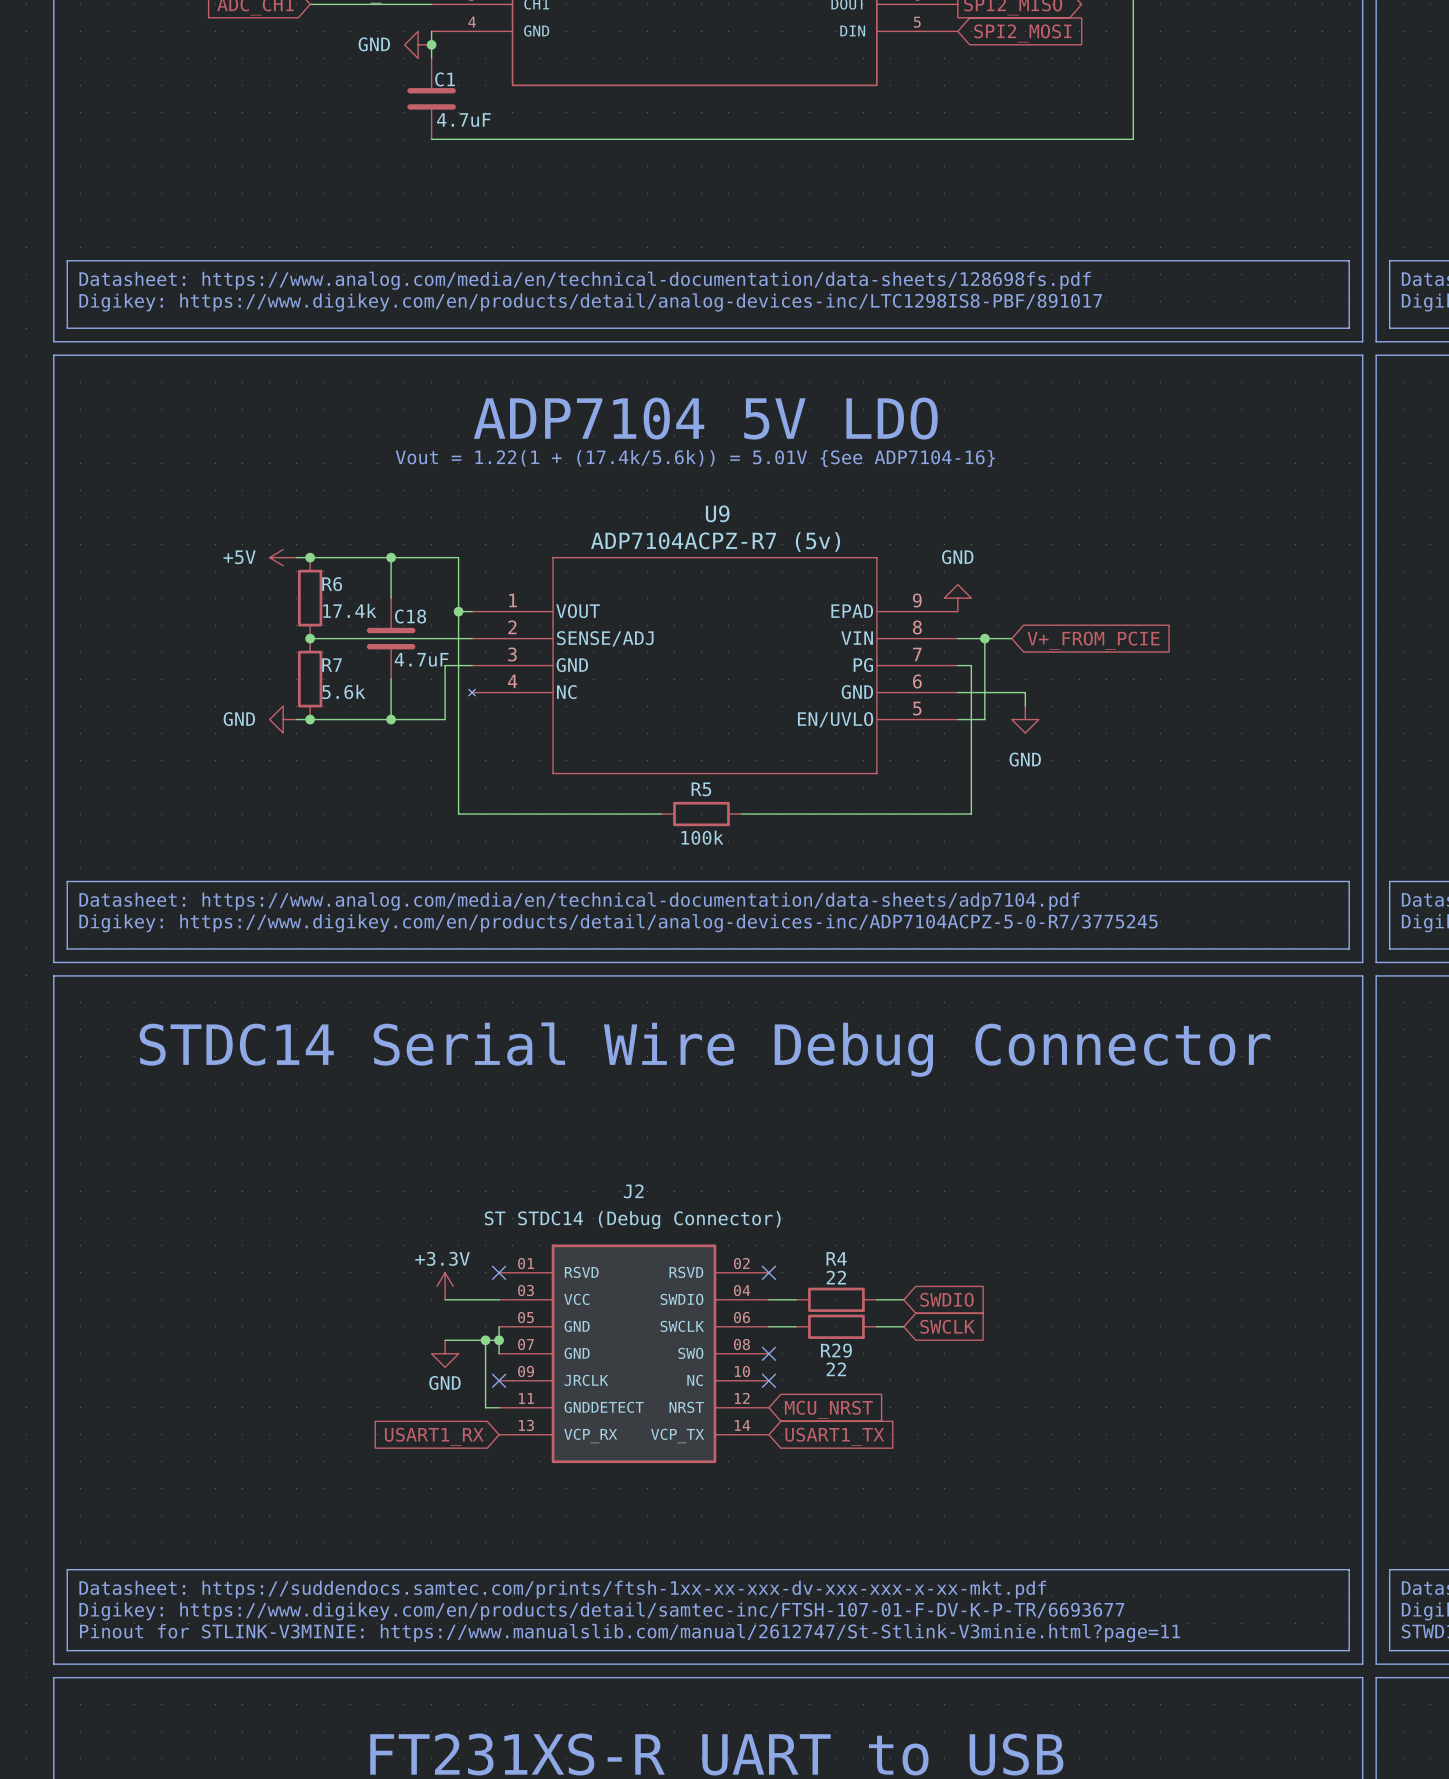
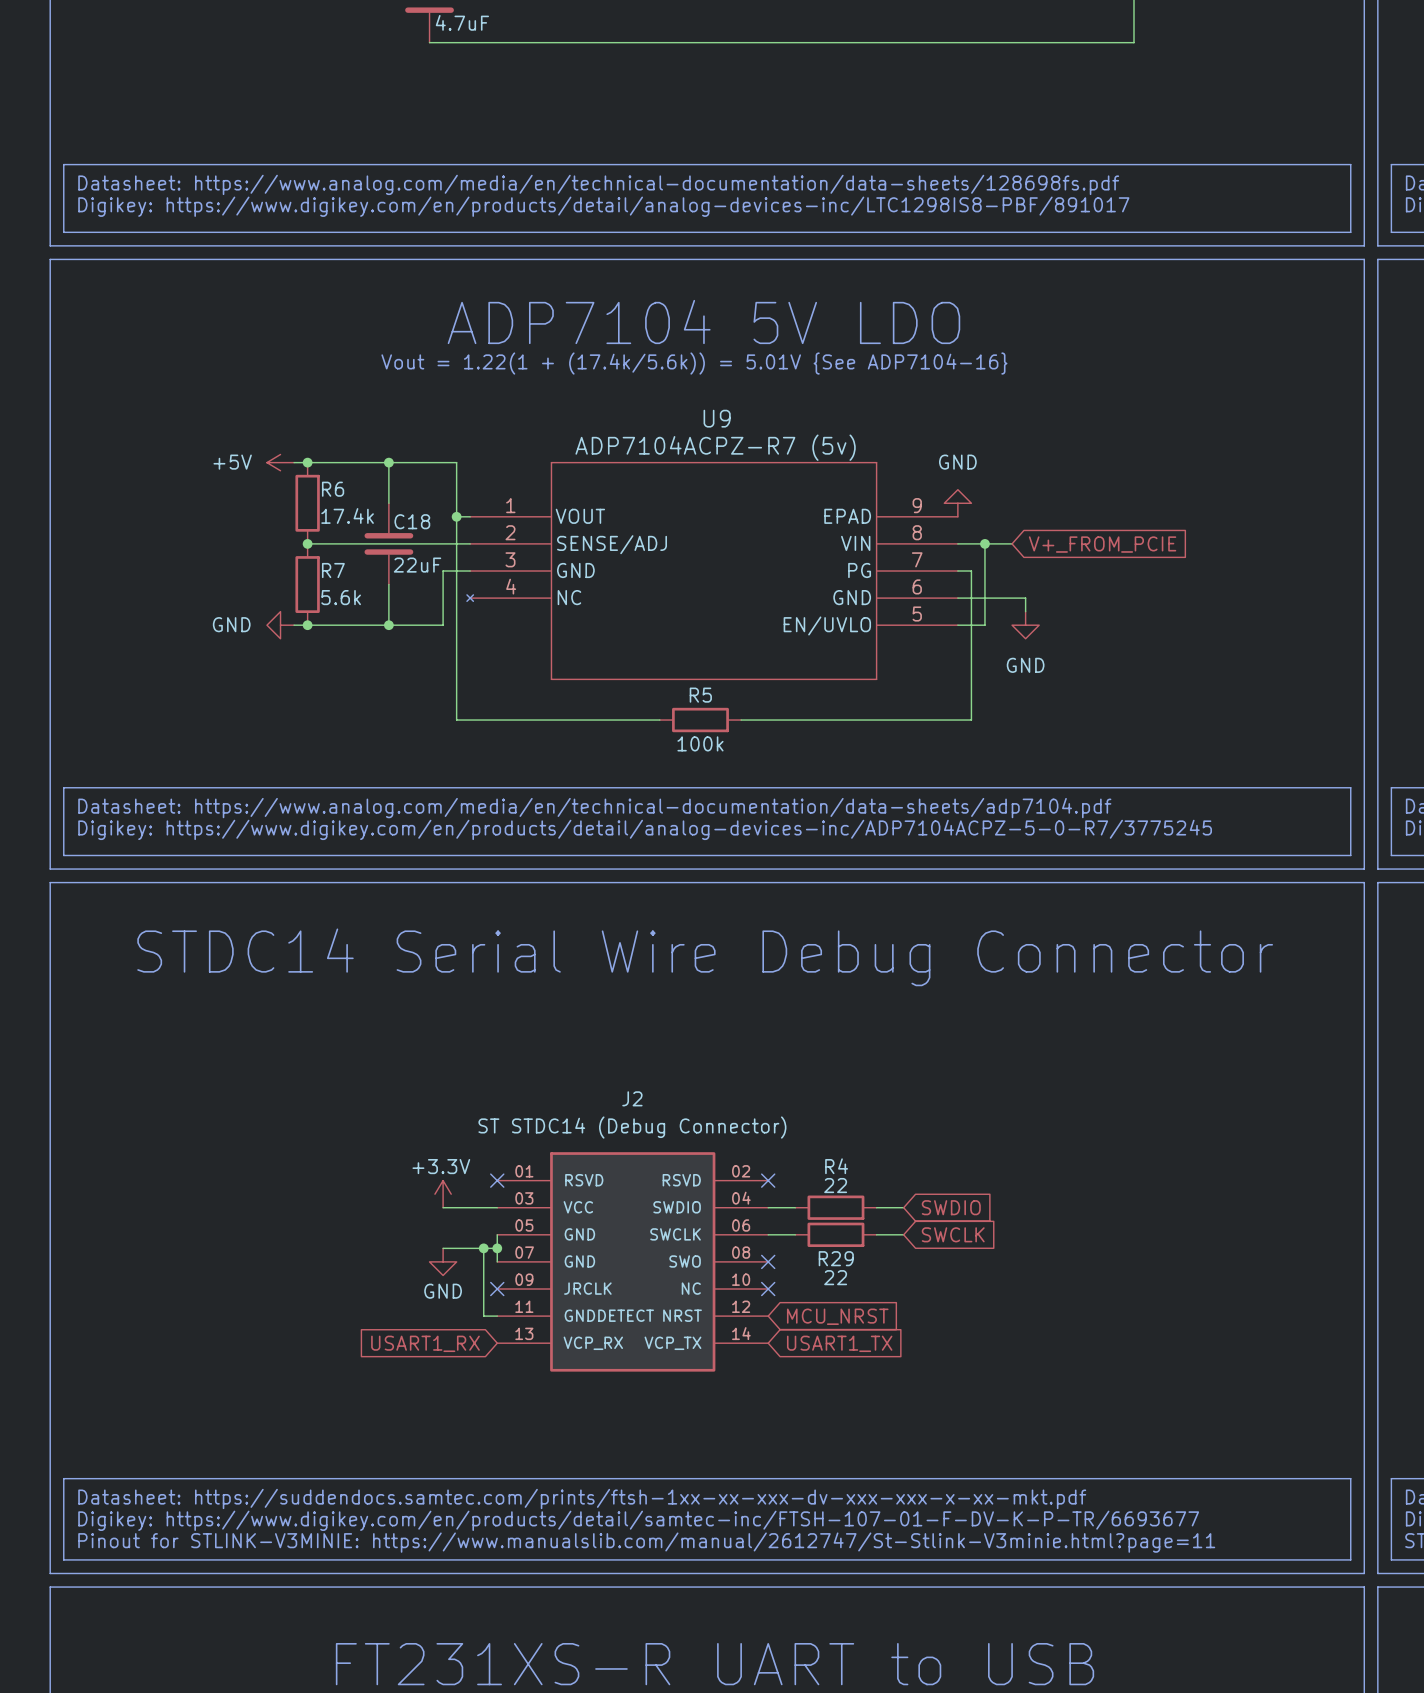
C18 value: 4.7uF (421, 659) -> 22uF (417, 565)

